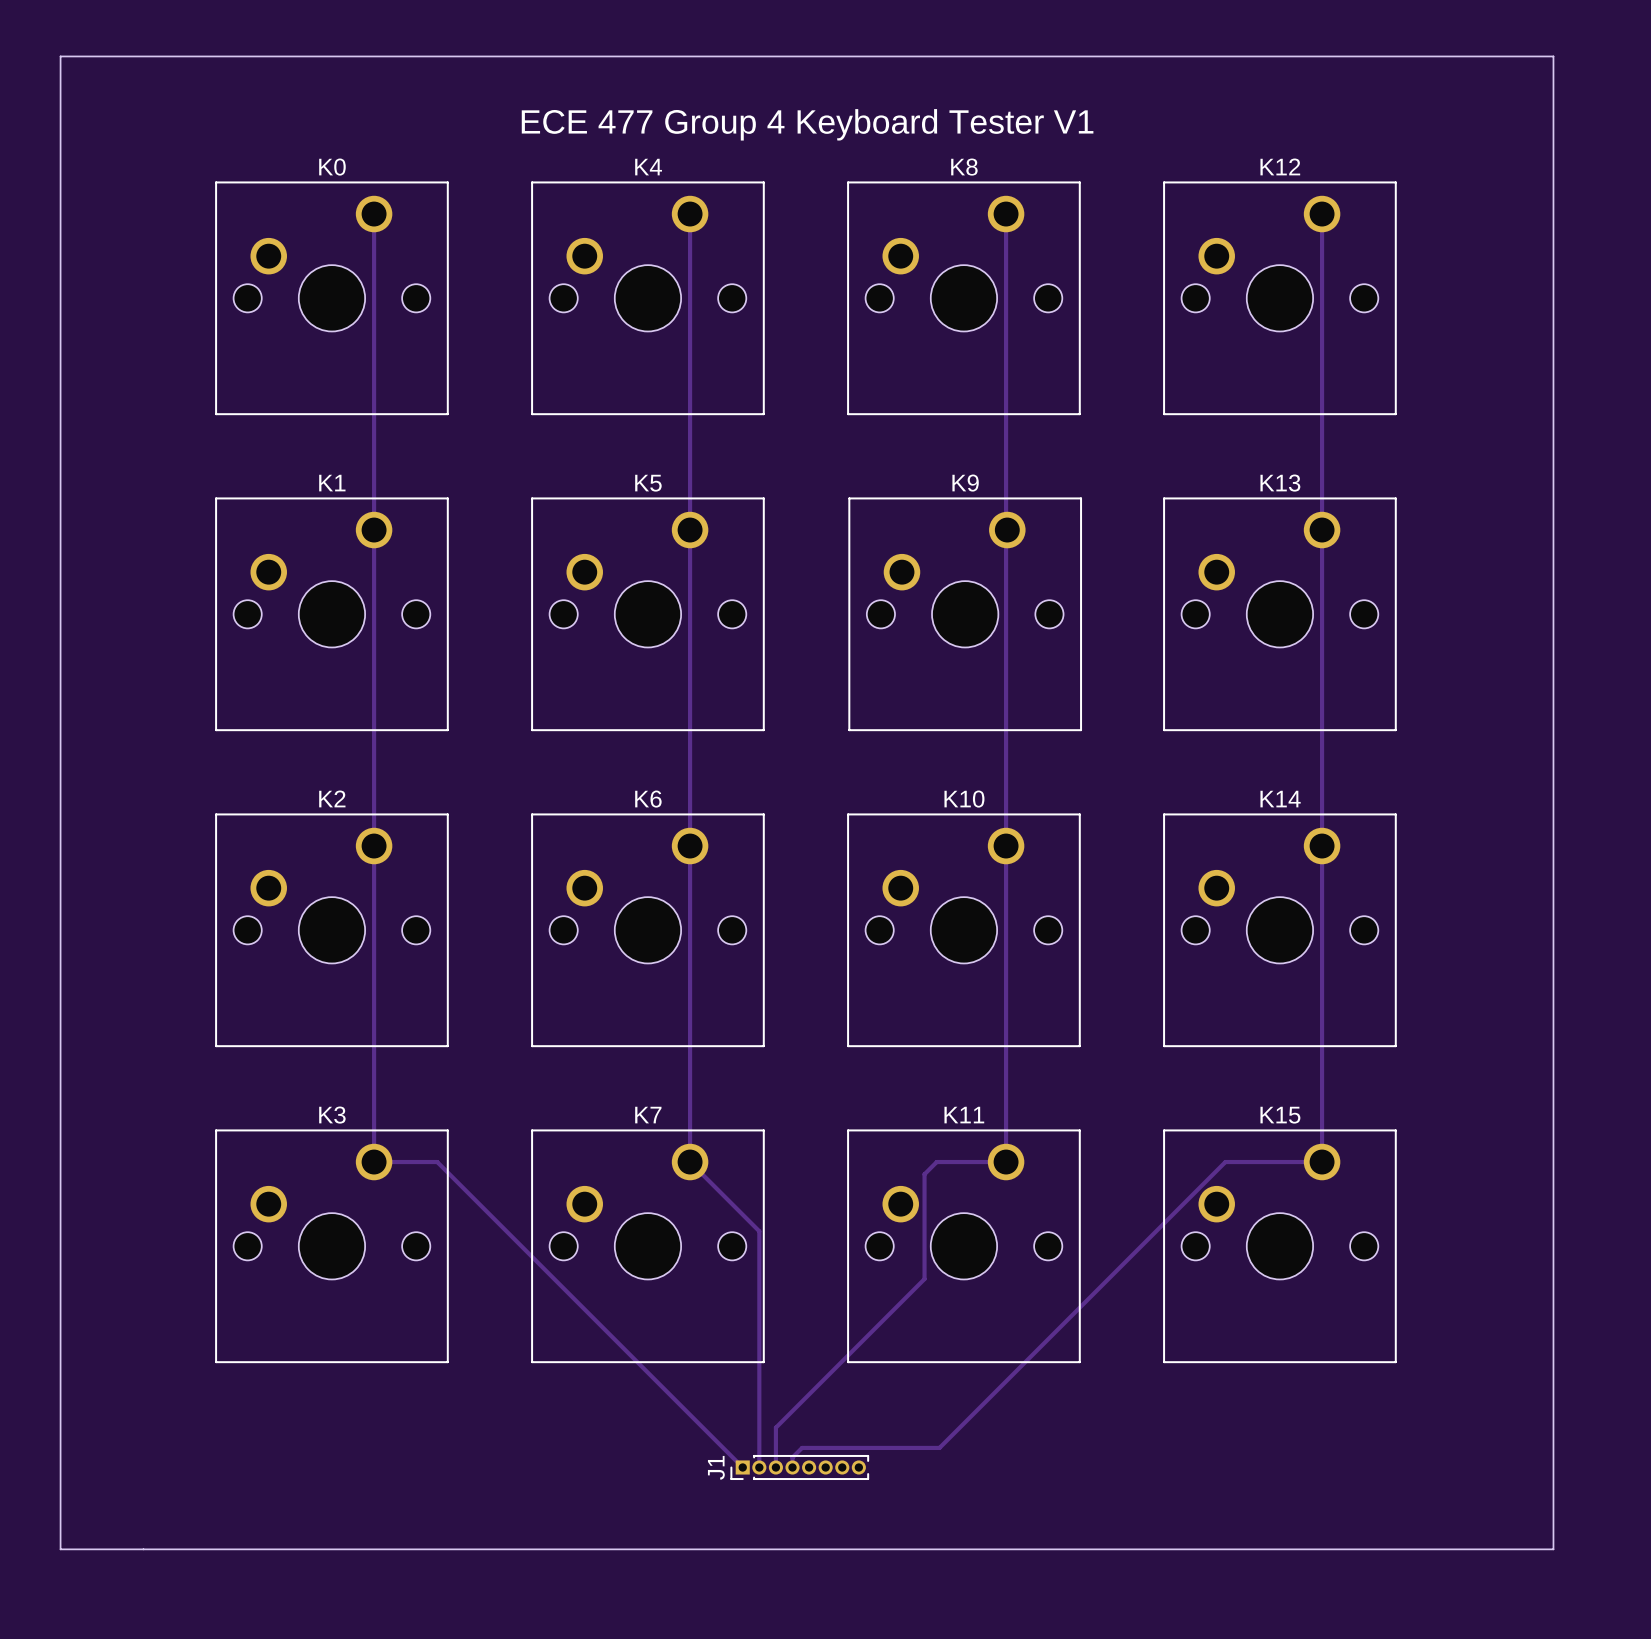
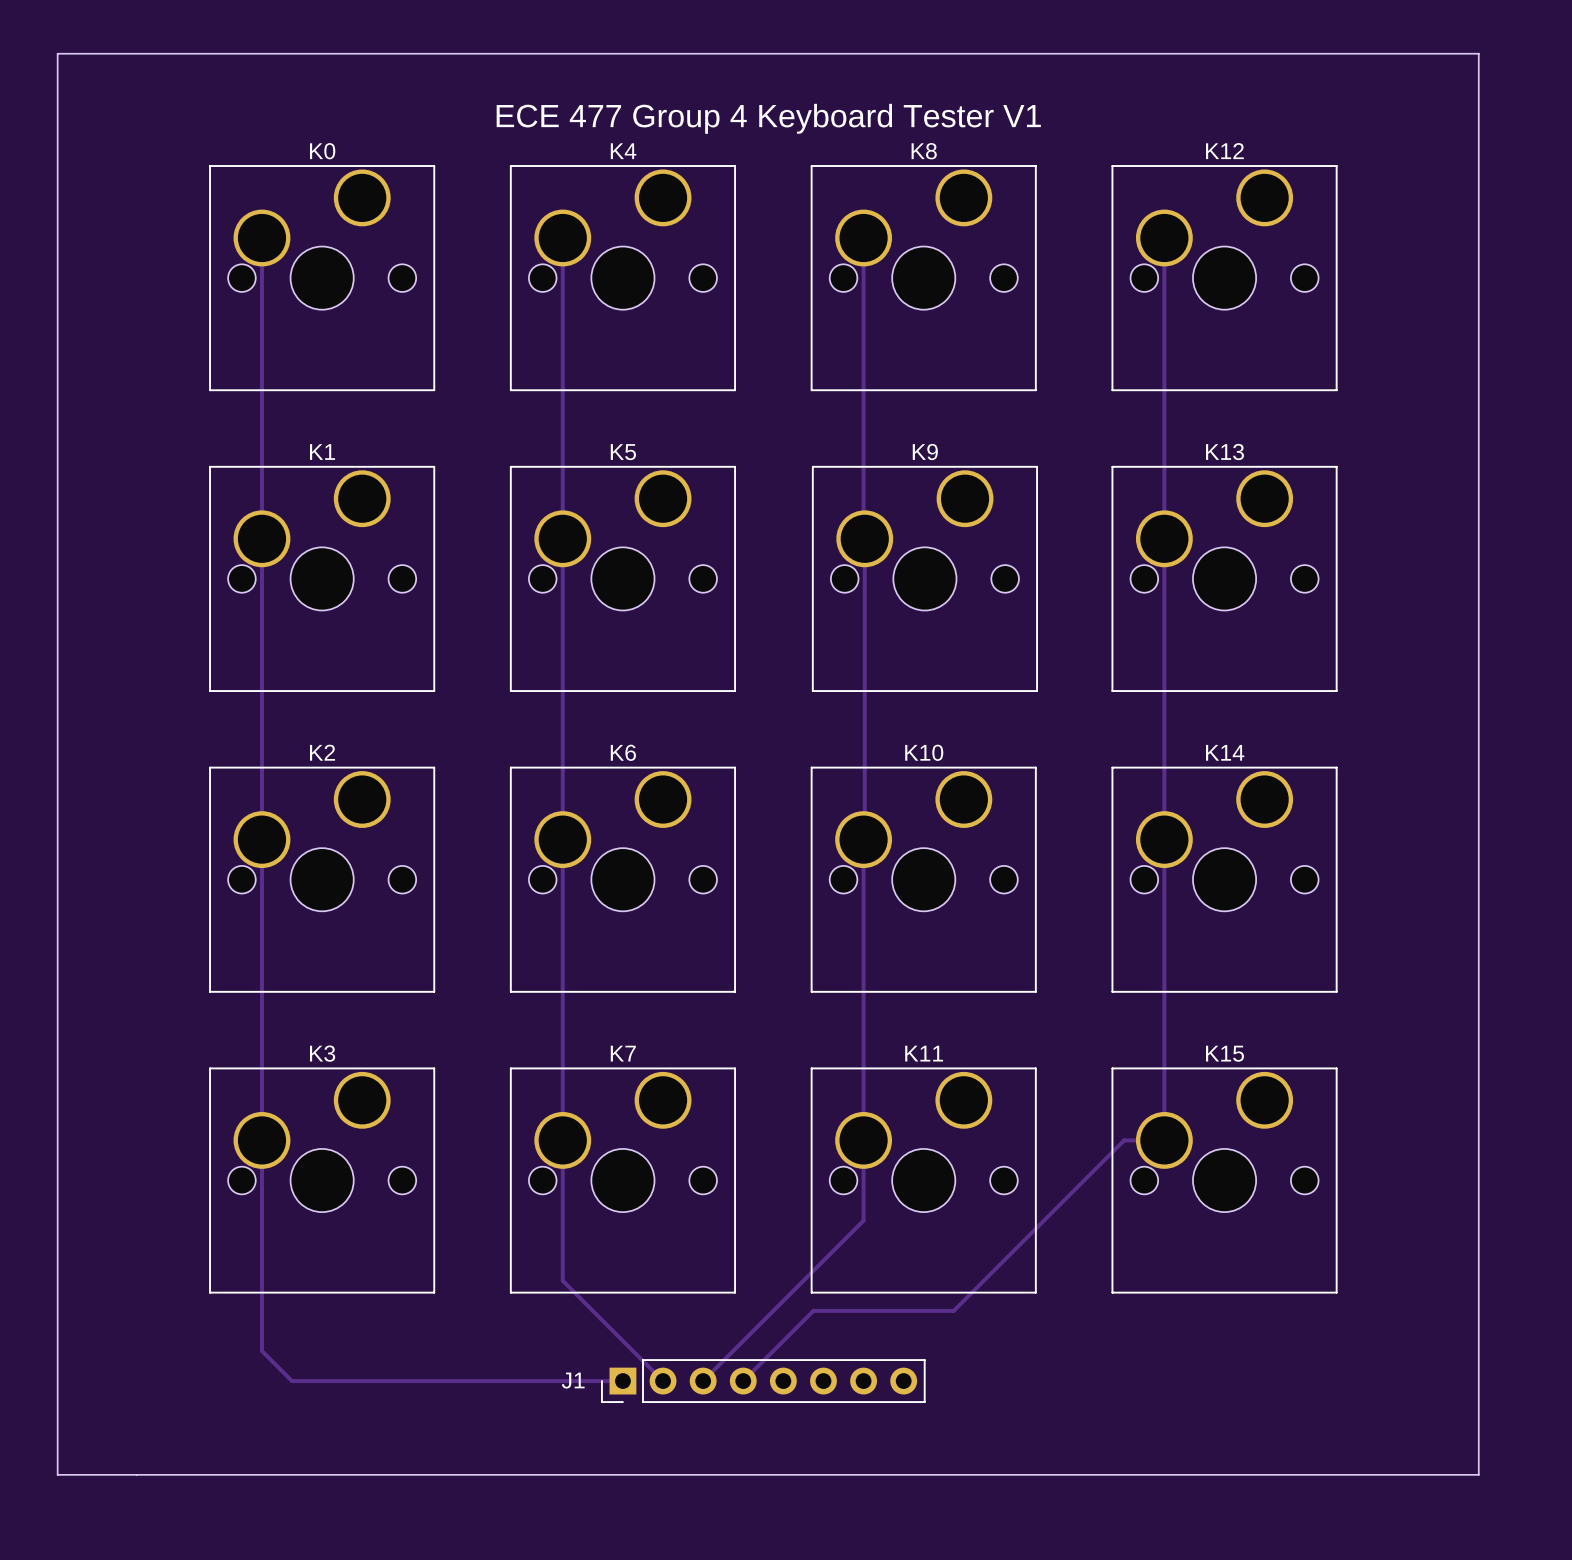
K0 footprint: [215, 181, 449, 416] -> [209, 165, 436, 392]
K4 footprint: [531, 181, 765, 416] -> [509, 165, 737, 392]
K8 footprint: [847, 181, 1081, 416] -> [810, 165, 1037, 392]
K12 footprint: [1163, 181, 1397, 416] -> [1111, 165, 1338, 392]
track: (1332, 203) (1322, 214) (1322, 1162) (1225, 1162) (939, 1447) (802, 1447) (792, 1457) (792, 1467) -> none
track: (374, 214) (374, 1162) (437, 1162) (742, 1467) -> none
track: (690, 214) (690, 1162) (759, 1231) (759, 1467) -> none
track: (1006, 214) (1006, 1162) (936, 1162) (924, 1174) (924, 1279) (775, 1427) (775, 1467) -> none
track: none -> (261, 238) (261, 1350) (292, 1381) (622, 1381)
track: none -> (562, 238) (562, 1280) (663, 1381)
track: none -> (863, 238) (863, 1220) (703, 1381)
track: none -> (1164, 238) (1164, 1140) (1124, 1140) (953, 1310) (813, 1310) (743, 1381)
K1 footprint: [215, 497, 449, 732] -> [209, 465, 436, 692]
K5 footprint: [531, 497, 765, 732] -> [509, 465, 737, 692]
K9 footprint: [848, 497, 1083, 732] -> [811, 465, 1038, 692]
K13 footprint: [1163, 497, 1397, 732] -> [1111, 465, 1338, 692]
K2 footprint: [215, 813, 449, 1048] -> [209, 766, 436, 993]
K6 footprint: [531, 813, 765, 1048] -> [509, 766, 737, 993]
K10 footprint: [847, 813, 1081, 1048] -> [810, 766, 1037, 993]
K14 footprint: [1163, 813, 1397, 1048] -> [1111, 766, 1338, 993]
K3 footprint: [215, 1129, 449, 1364] -> [209, 1067, 436, 1294]
K7 footprint: [531, 1129, 765, 1364] -> [509, 1067, 737, 1294]
K11 footprint: [847, 1129, 1081, 1364] -> [810, 1067, 1037, 1294]
K15 footprint: [1163, 1129, 1397, 1364] -> [1111, 1067, 1338, 1294]
J1 footprint: [730, 1454, 870, 1481] -> [600, 1359, 926, 1404]
J1 name position: J1 (716, 1467) -> J1 (573, 1380)

